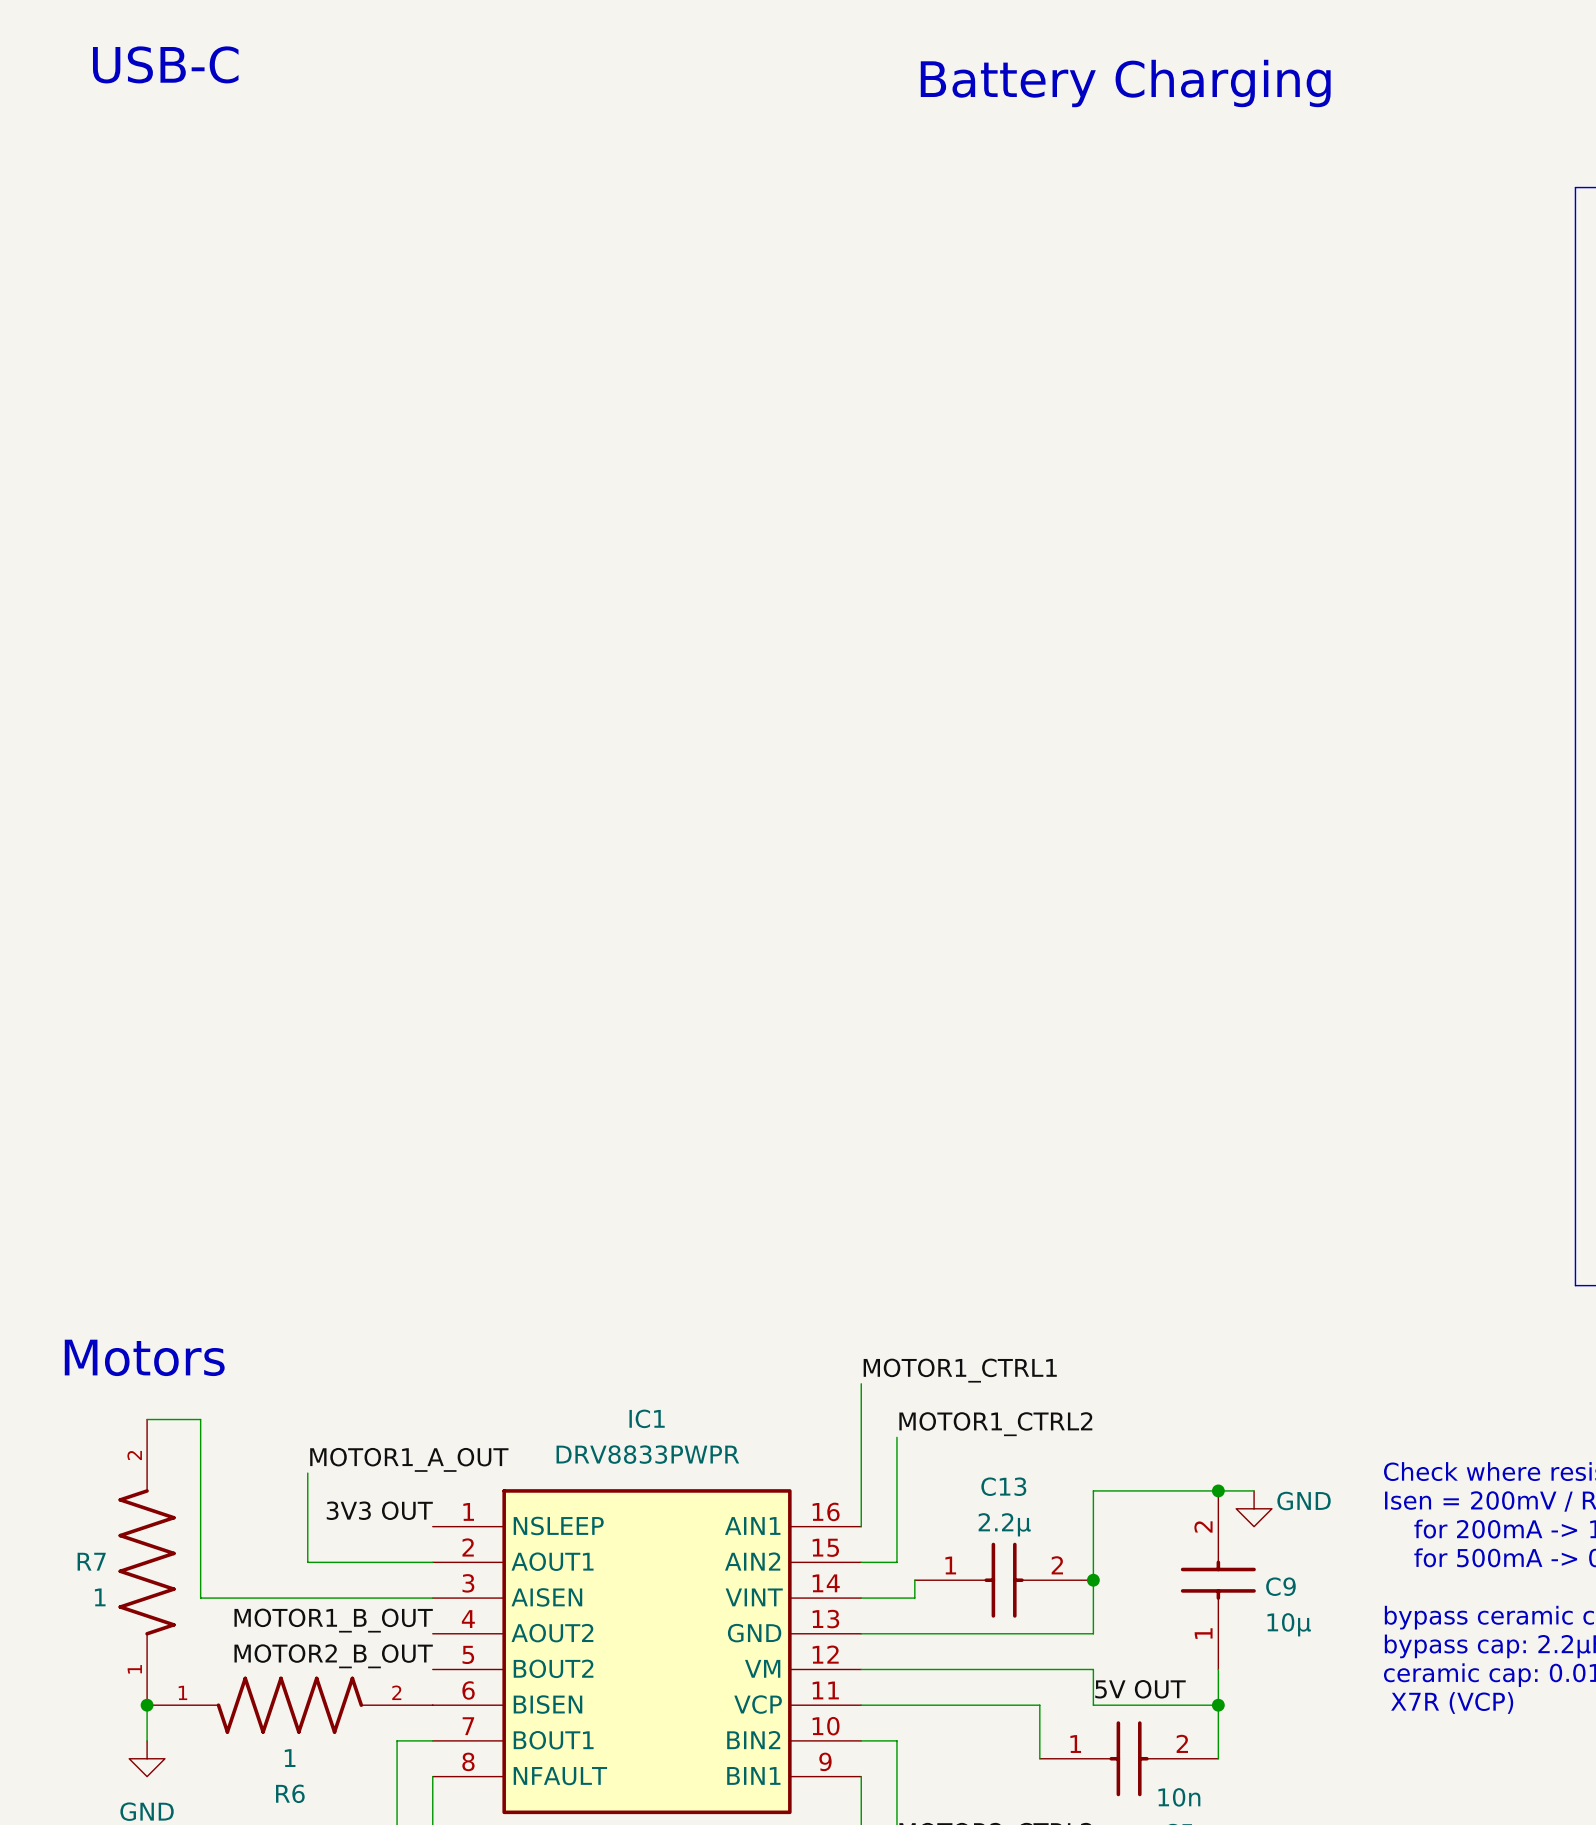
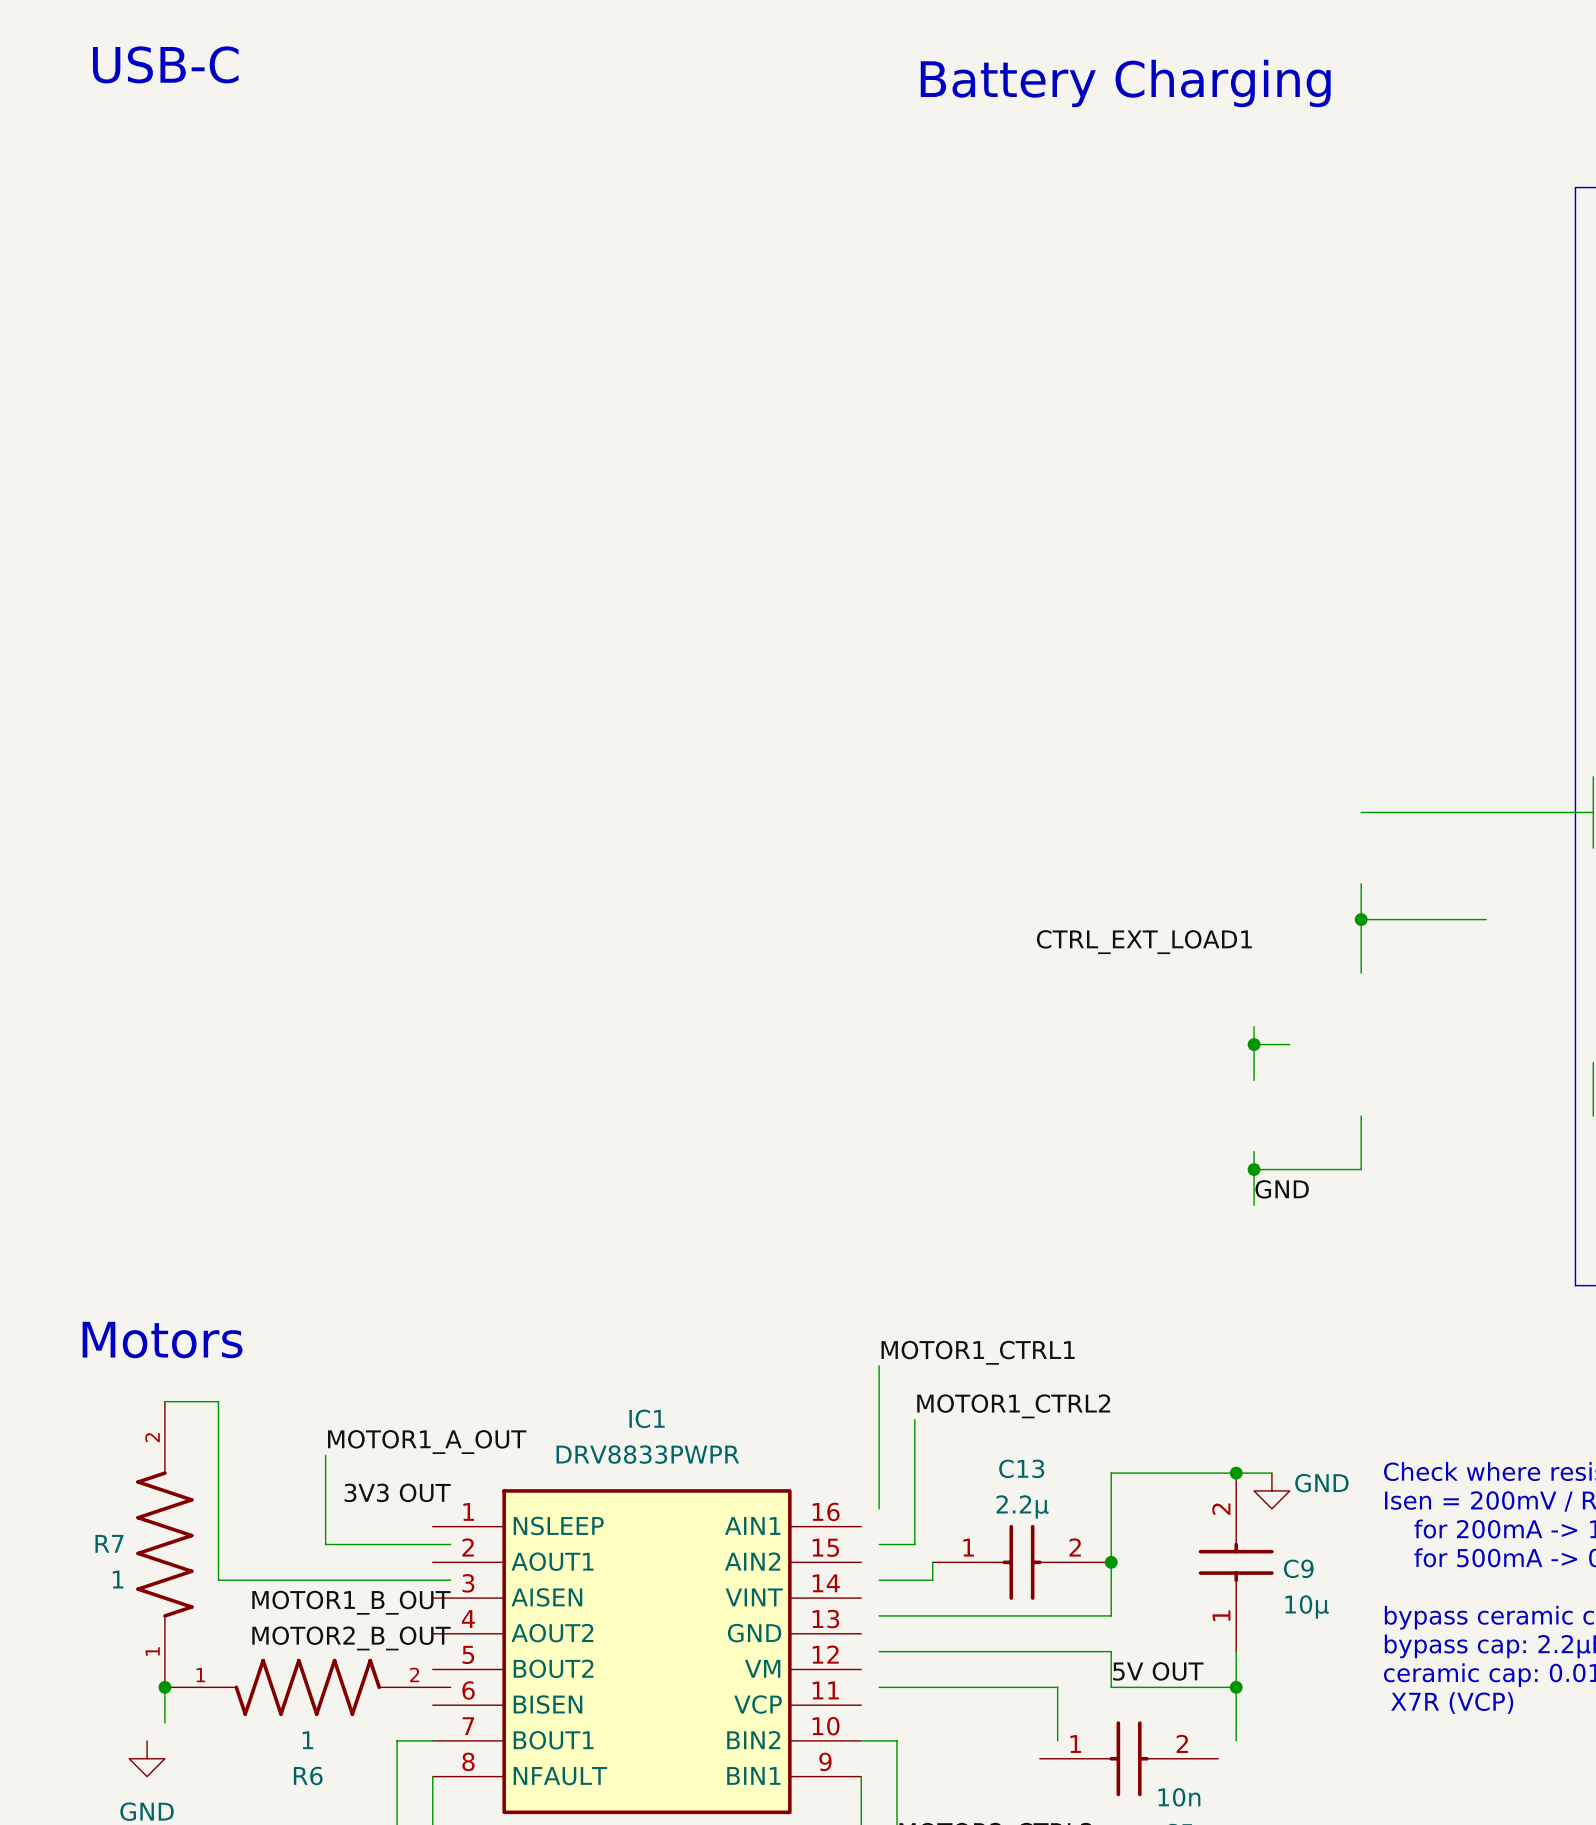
wire: none -> (1593, 776) (1593, 848)
wire: none -> (1361, 812) (1593, 812)
wire: none -> (1361, 883) (1361, 973)
wire: none -> (1361, 919) (1486, 919)
junction: none -> (1361, 919)
label: none -> CTRL_EXT_LOAD1 (1144, 942)
wire: none -> (1254, 1026) (1254, 1080)
wire: none -> (1254, 1044) (1289, 1044)
junction: none -> (1254, 1044)
wire: none -> (1593, 1062) (1593, 1115)
wire: none -> (1361, 1115) (1361, 1169) (1254, 1169)
wire: none -> (1254, 1151) (1254, 1205)
junction: none -> (1254, 1169)
label: none -> GND (1282, 1189)
text position: Motors (144, 1357) -> Motors (162, 1340)
label position: MOTOR1_CTRL1 (960, 1370) -> MOTOR1_CTRL1 (978, 1352)
wire: (861, 1383) (861, 1526) -> (879, 1365) (879, 1508)
wire: (147, 1419) (200, 1419) (200, 1598) (432, 1598) -> (164, 1401) (218, 1401) (218, 1580) (450, 1580)
label position: MOTOR1_CTRL2 (995, 1424) -> MOTOR1_CTRL2 (1013, 1406)
wire: (896, 1437) (896, 1562) (861, 1562) -> (914, 1419) (914, 1544) (879, 1544)
label position: MOTOR1_A_OUT (409, 1459) -> MOTOR1_A_OUT (427, 1442)
wire: (307, 1473) (307, 1562) (432, 1562) -> (325, 1455) (325, 1544) (450, 1544)
junction position: (1218, 1490) -> (1236, 1473)
wire: (1254, 1490) (1093, 1490) (1093, 1633) (861, 1633) -> (1271, 1473) (1111, 1473) (1111, 1615) (879, 1615)
power symbol position: GND (1254, 1508) -> GND (1271, 1490)
label position: 3V3 OUT (379, 1510) -> 3V3 OUT (397, 1492)
R7 position: (147, 1562) -> (164, 1544)
wire: (914, 1580) (914, 1598) (861, 1598) -> (932, 1562) (932, 1580) (879, 1580)
C13 position: (1004, 1580) -> (1021, 1562)
junction position: (1093, 1580) -> (1111, 1562)
C9 position: (1218, 1580) -> (1236, 1562)
label position: MOTOR1_B_OUT (333, 1620) -> MOTOR1_B_OUT (351, 1602)
label position: MOTOR2_B_OUT (333, 1656) -> MOTOR2_B_OUT (351, 1638)
wire: (861, 1669) (1093, 1669) (1093, 1705) (1218, 1705) -> (879, 1651) (1111, 1651) (1111, 1687) (1236, 1687)
wire: (1218, 1669) (1218, 1758) -> (1236, 1651) (1236, 1740)
label position: 5V OUT (1140, 1689) -> 5V OUT (1158, 1671)
wire: (147, 1705) (147, 1740) -> (164, 1687) (164, 1723)
junction position: (147, 1705) -> (164, 1687)
R6 position: (289, 1705) -> (307, 1687)
wire: (861, 1705) (1039, 1705) (1039, 1758) -> (879, 1687) (1057, 1687) (1057, 1740)
junction position: (1218, 1705) -> (1236, 1687)

